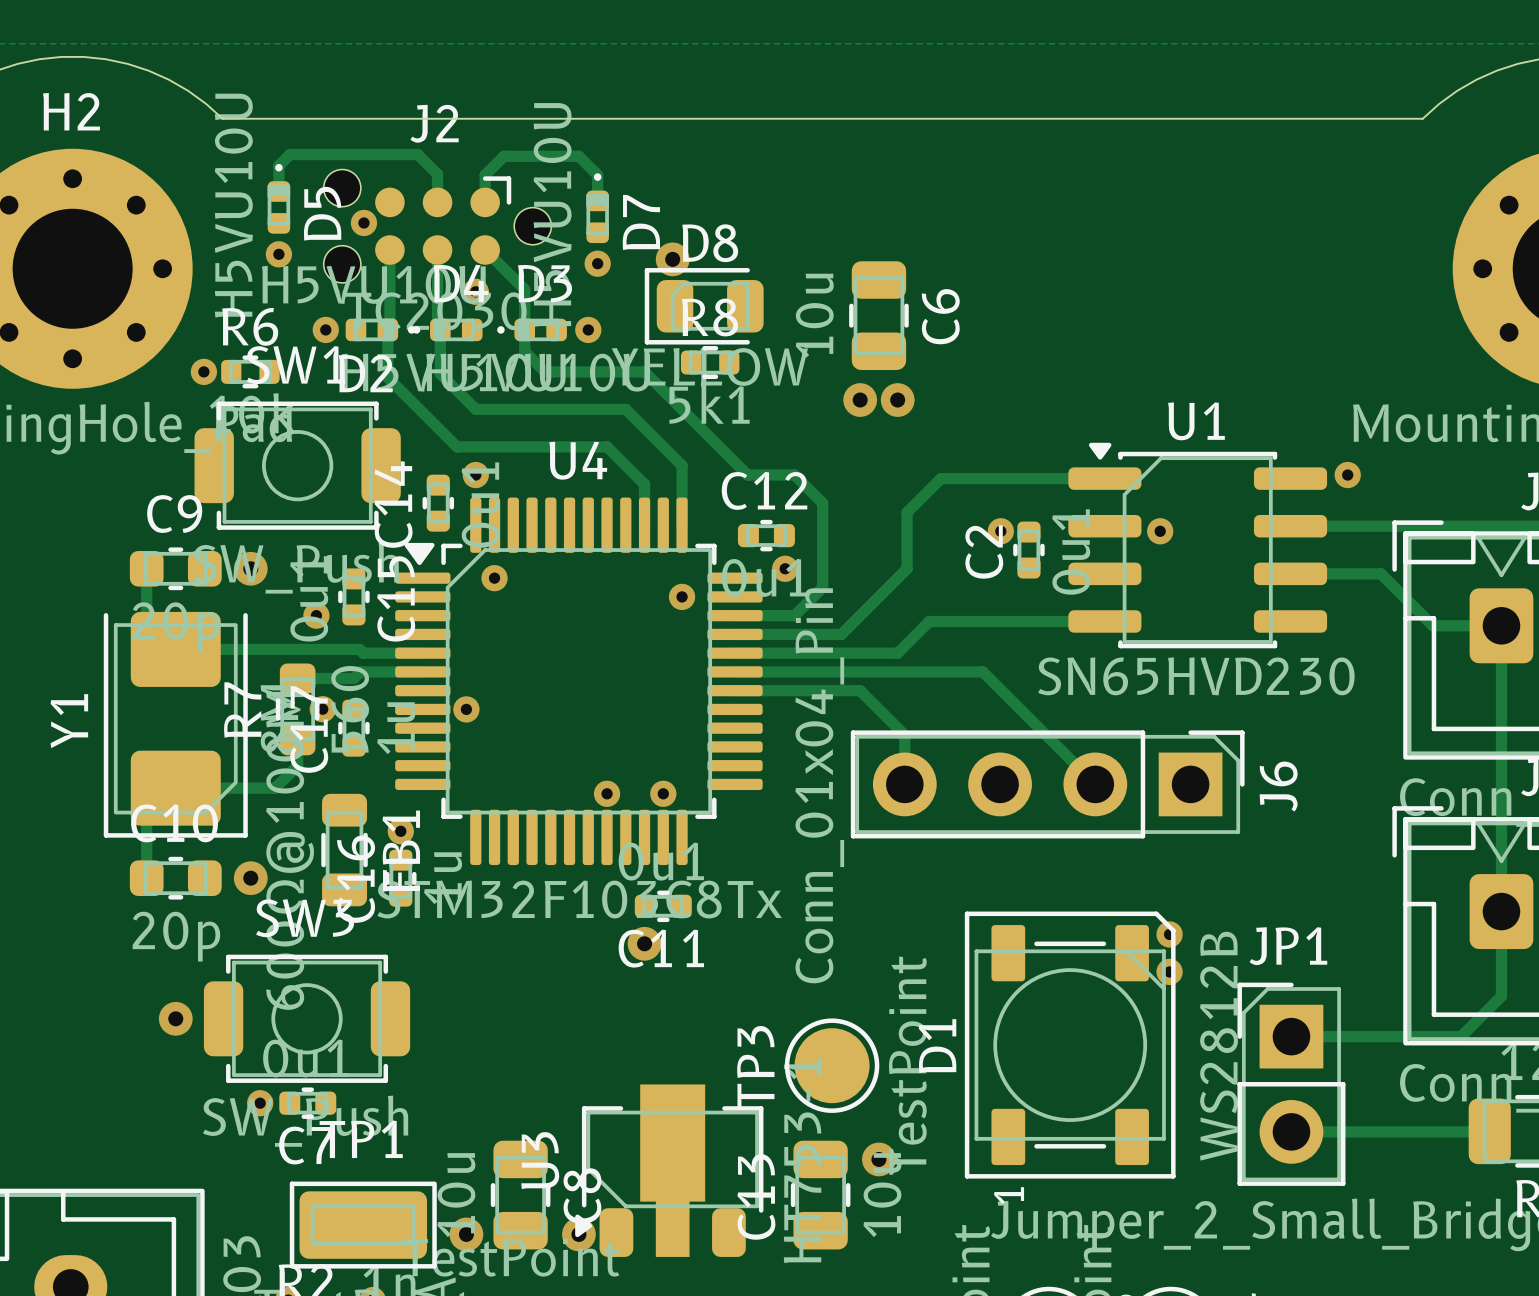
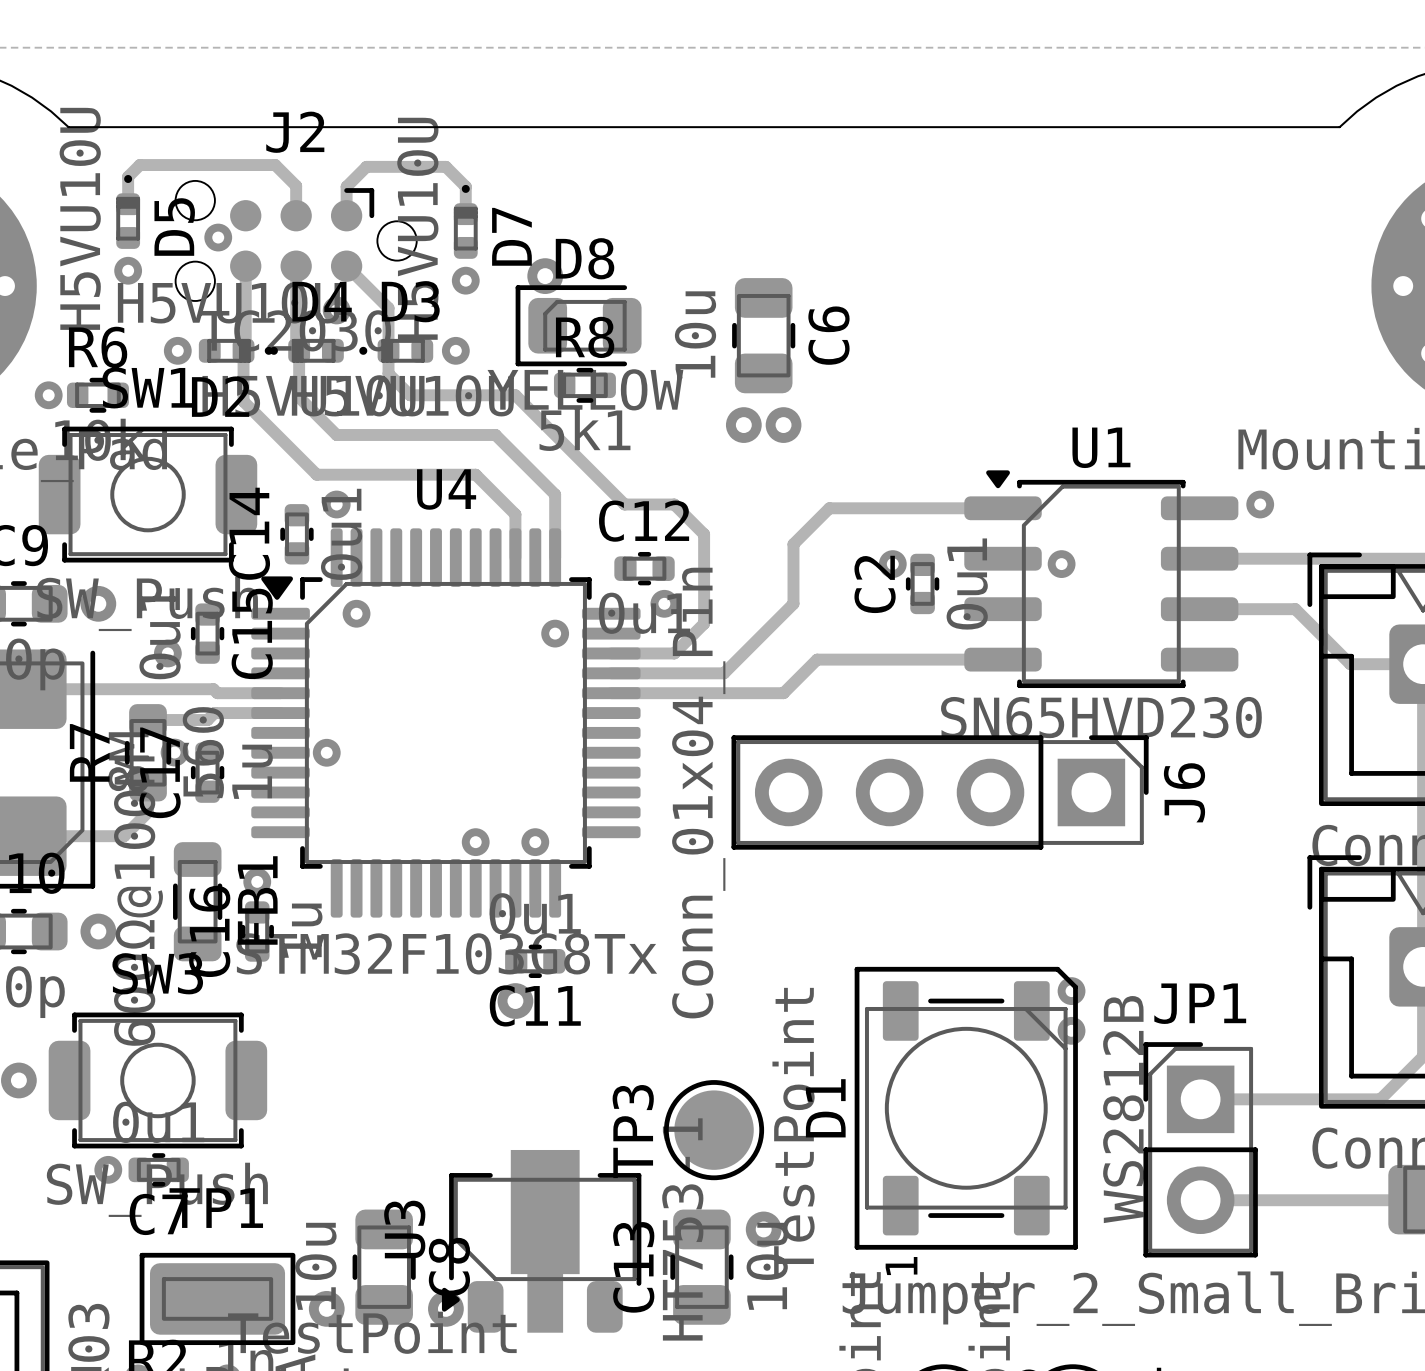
track: (735, 671) (982, 671) (1095, 784) -> none
track: (735, 690) (860, 690) (904, 735) (904, 784) -> none
J6 position: (1047, 784) -> (940, 792)

